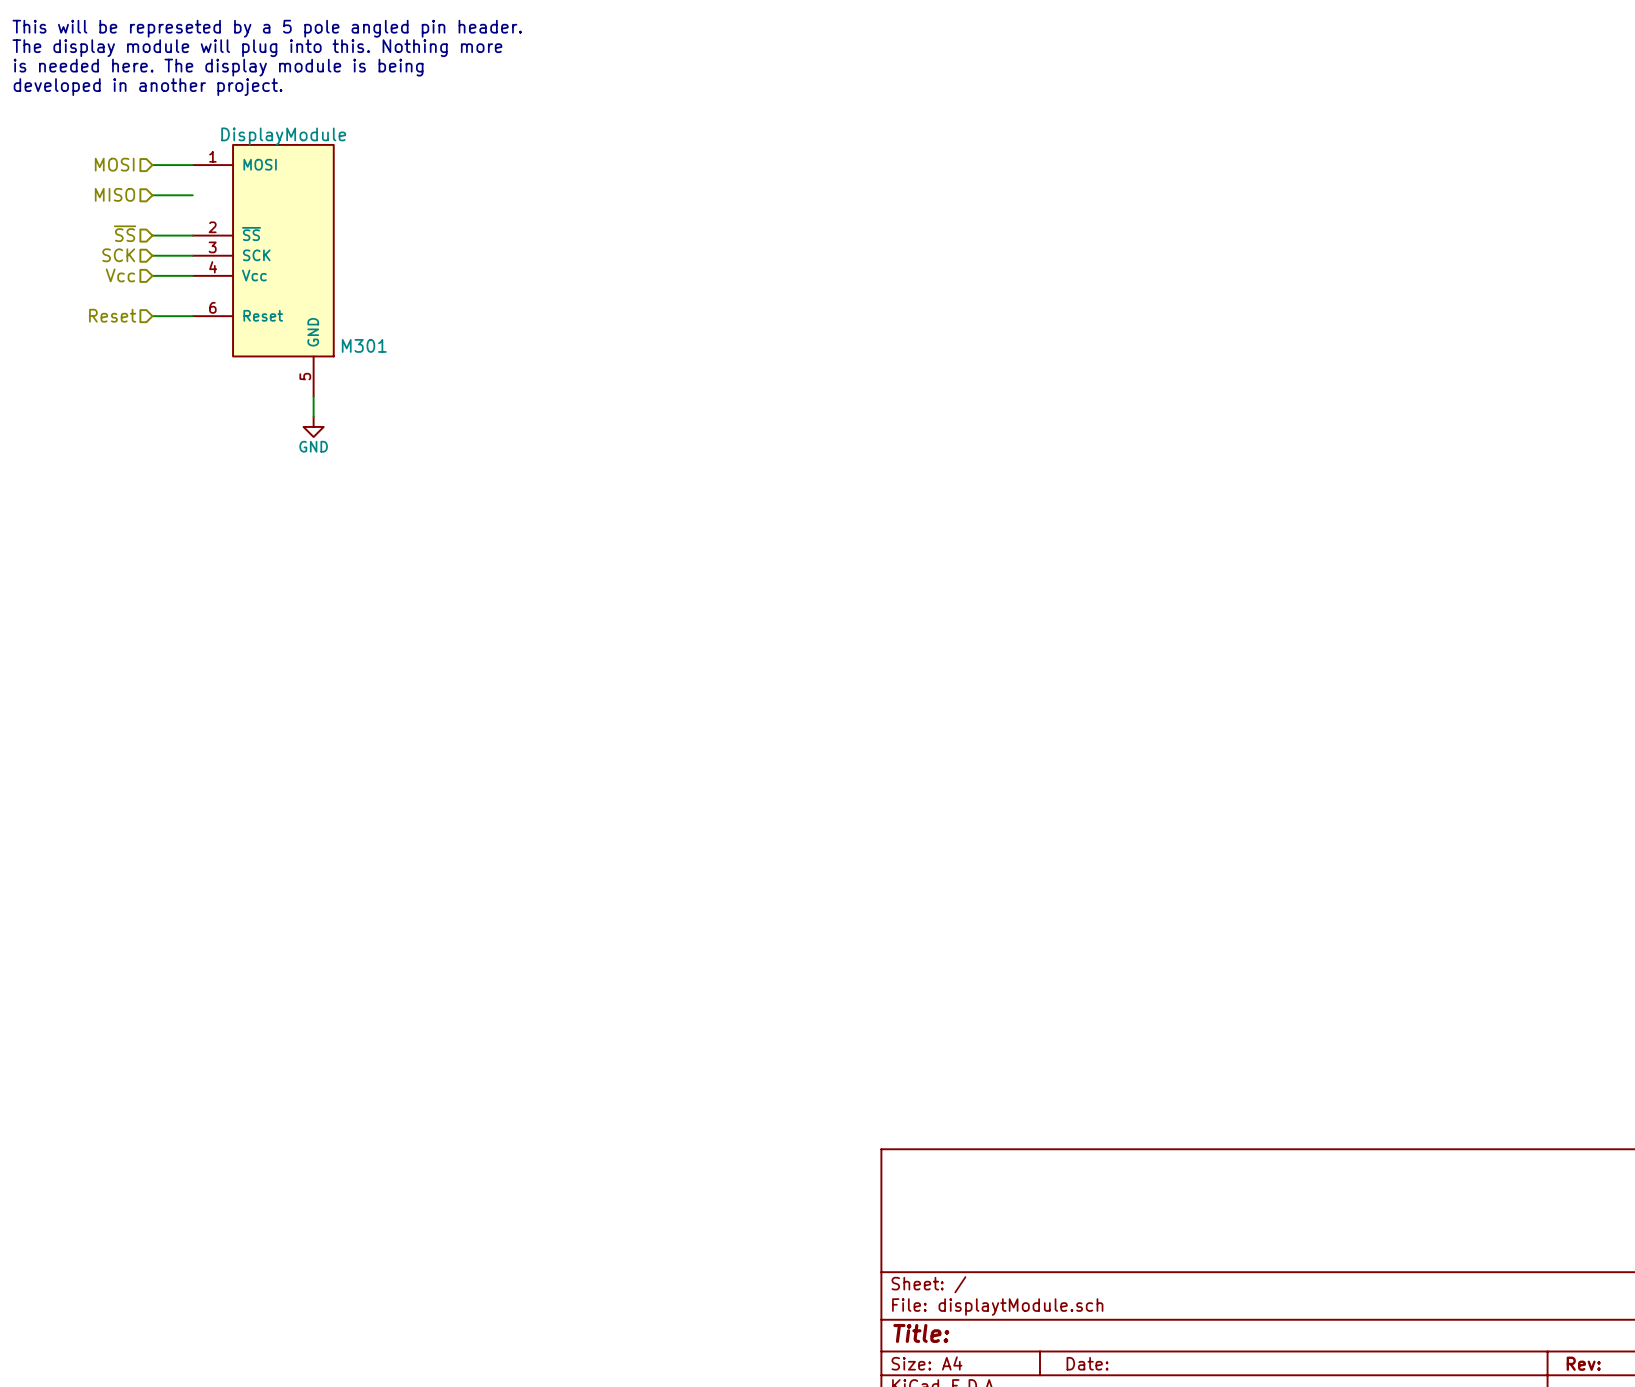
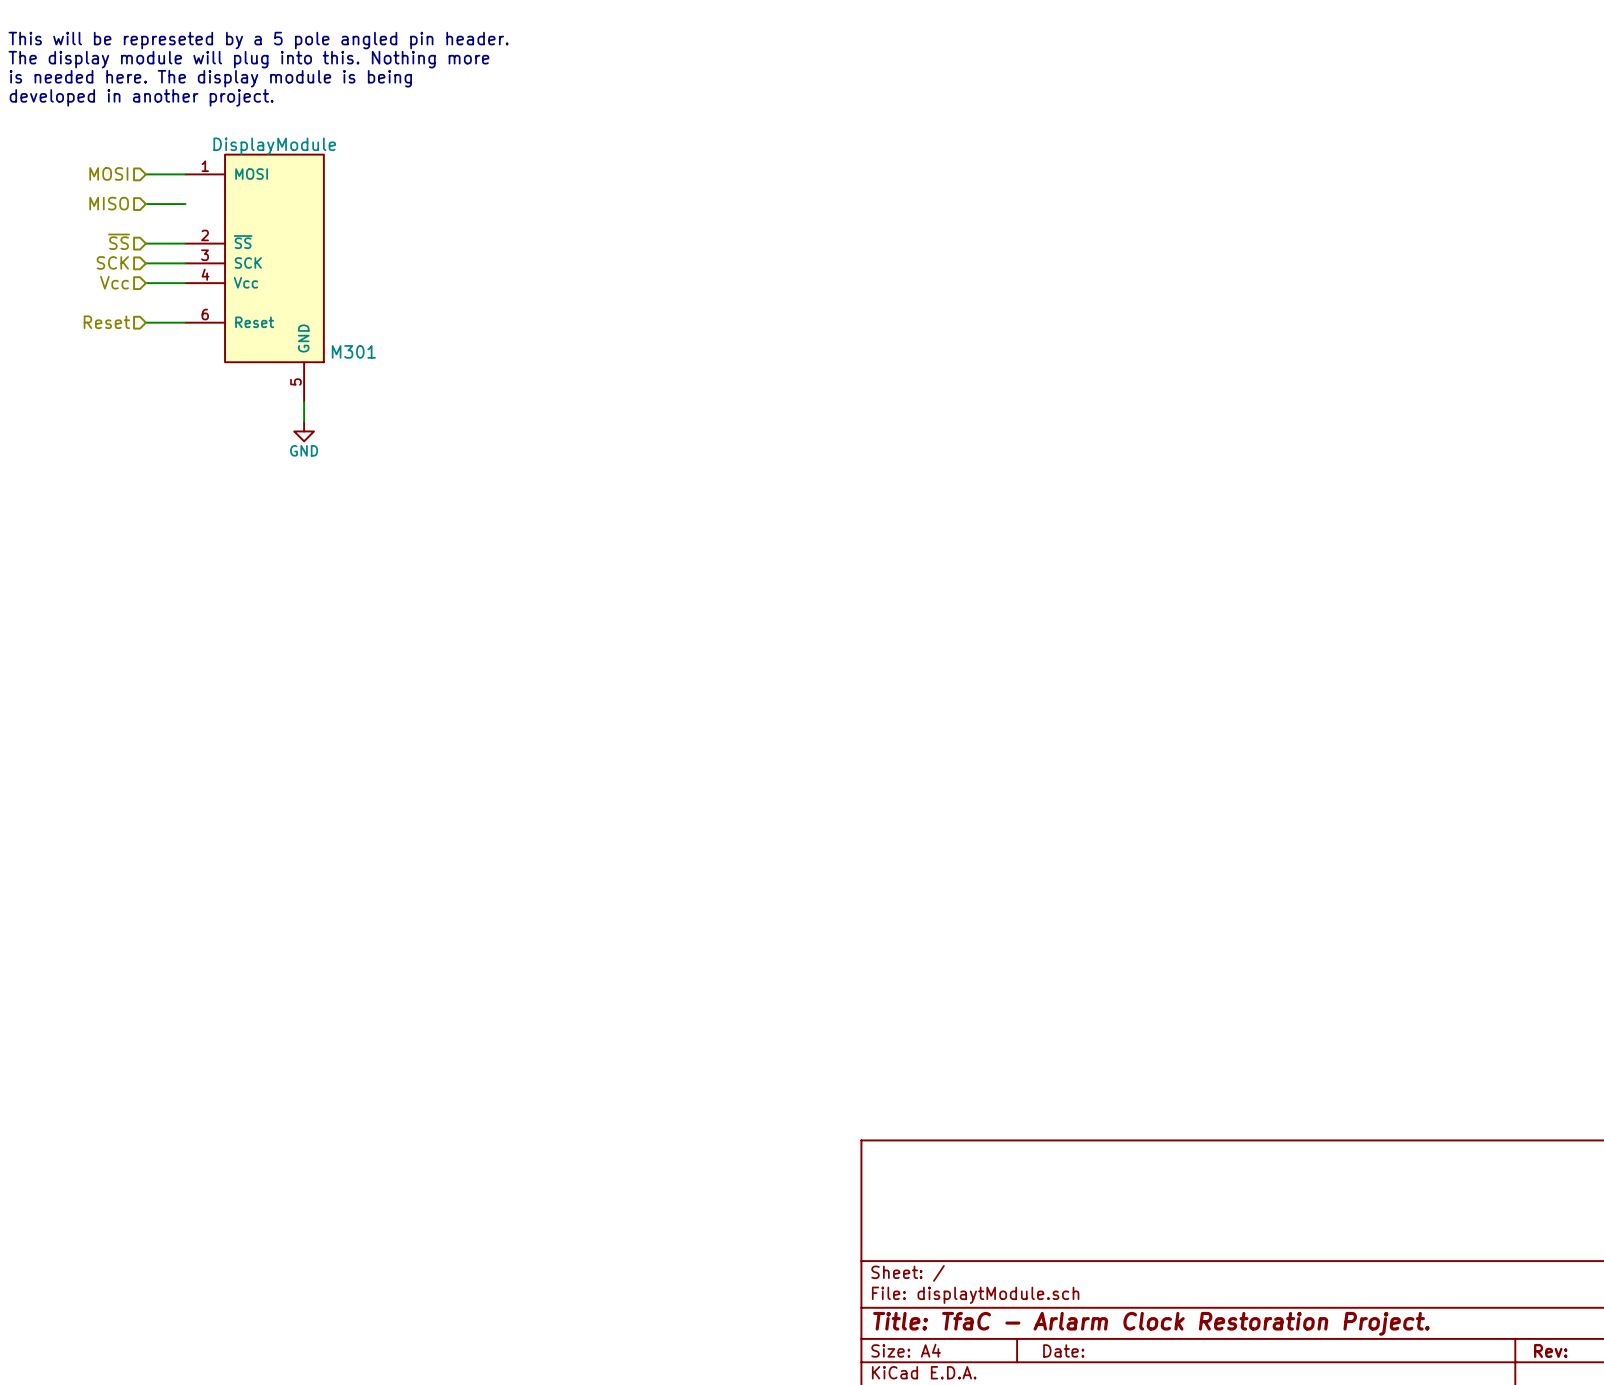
title block: Title: (921, 1333) -> Title: TfaC - Arlarm Clock Restoration Project. (1151, 1323)

